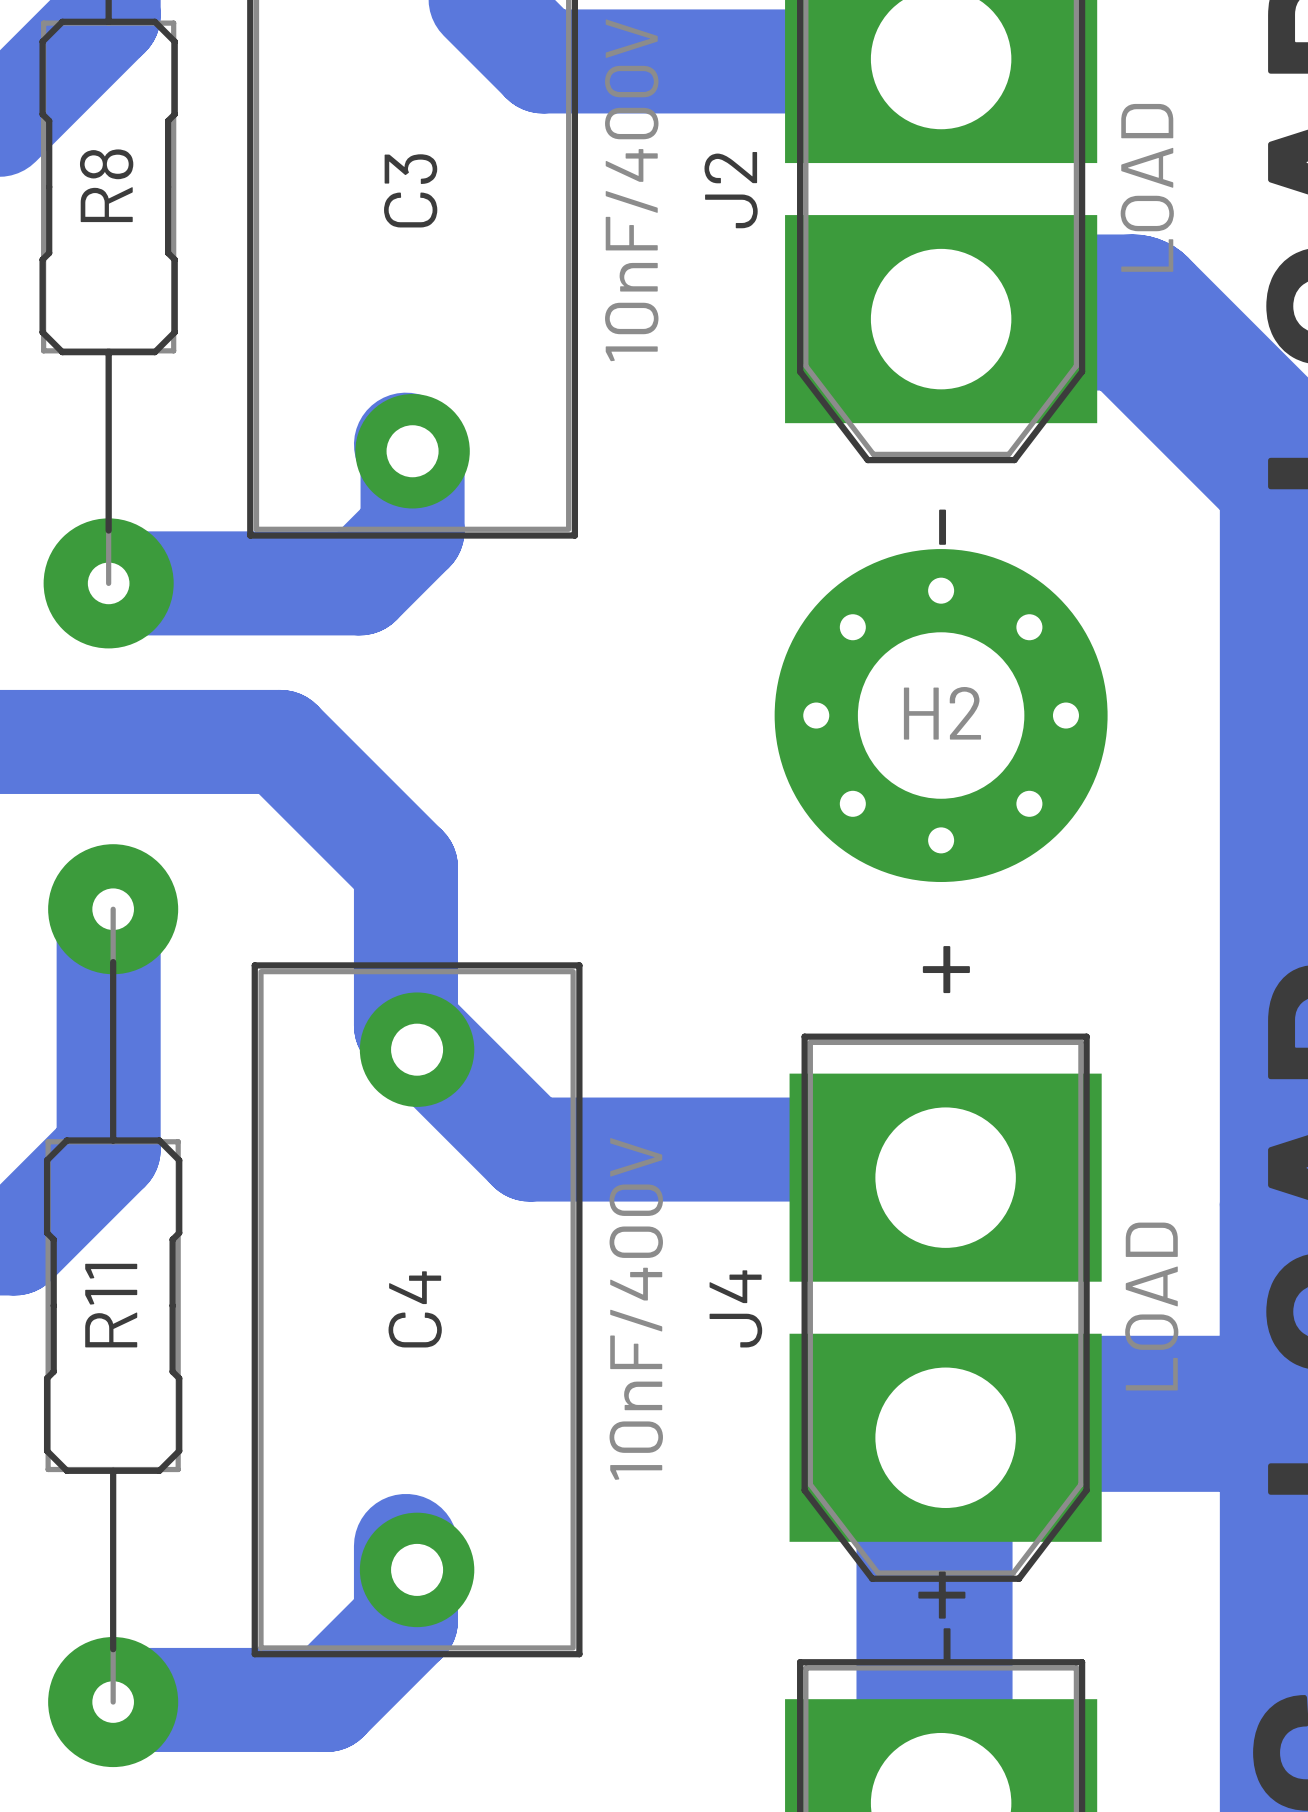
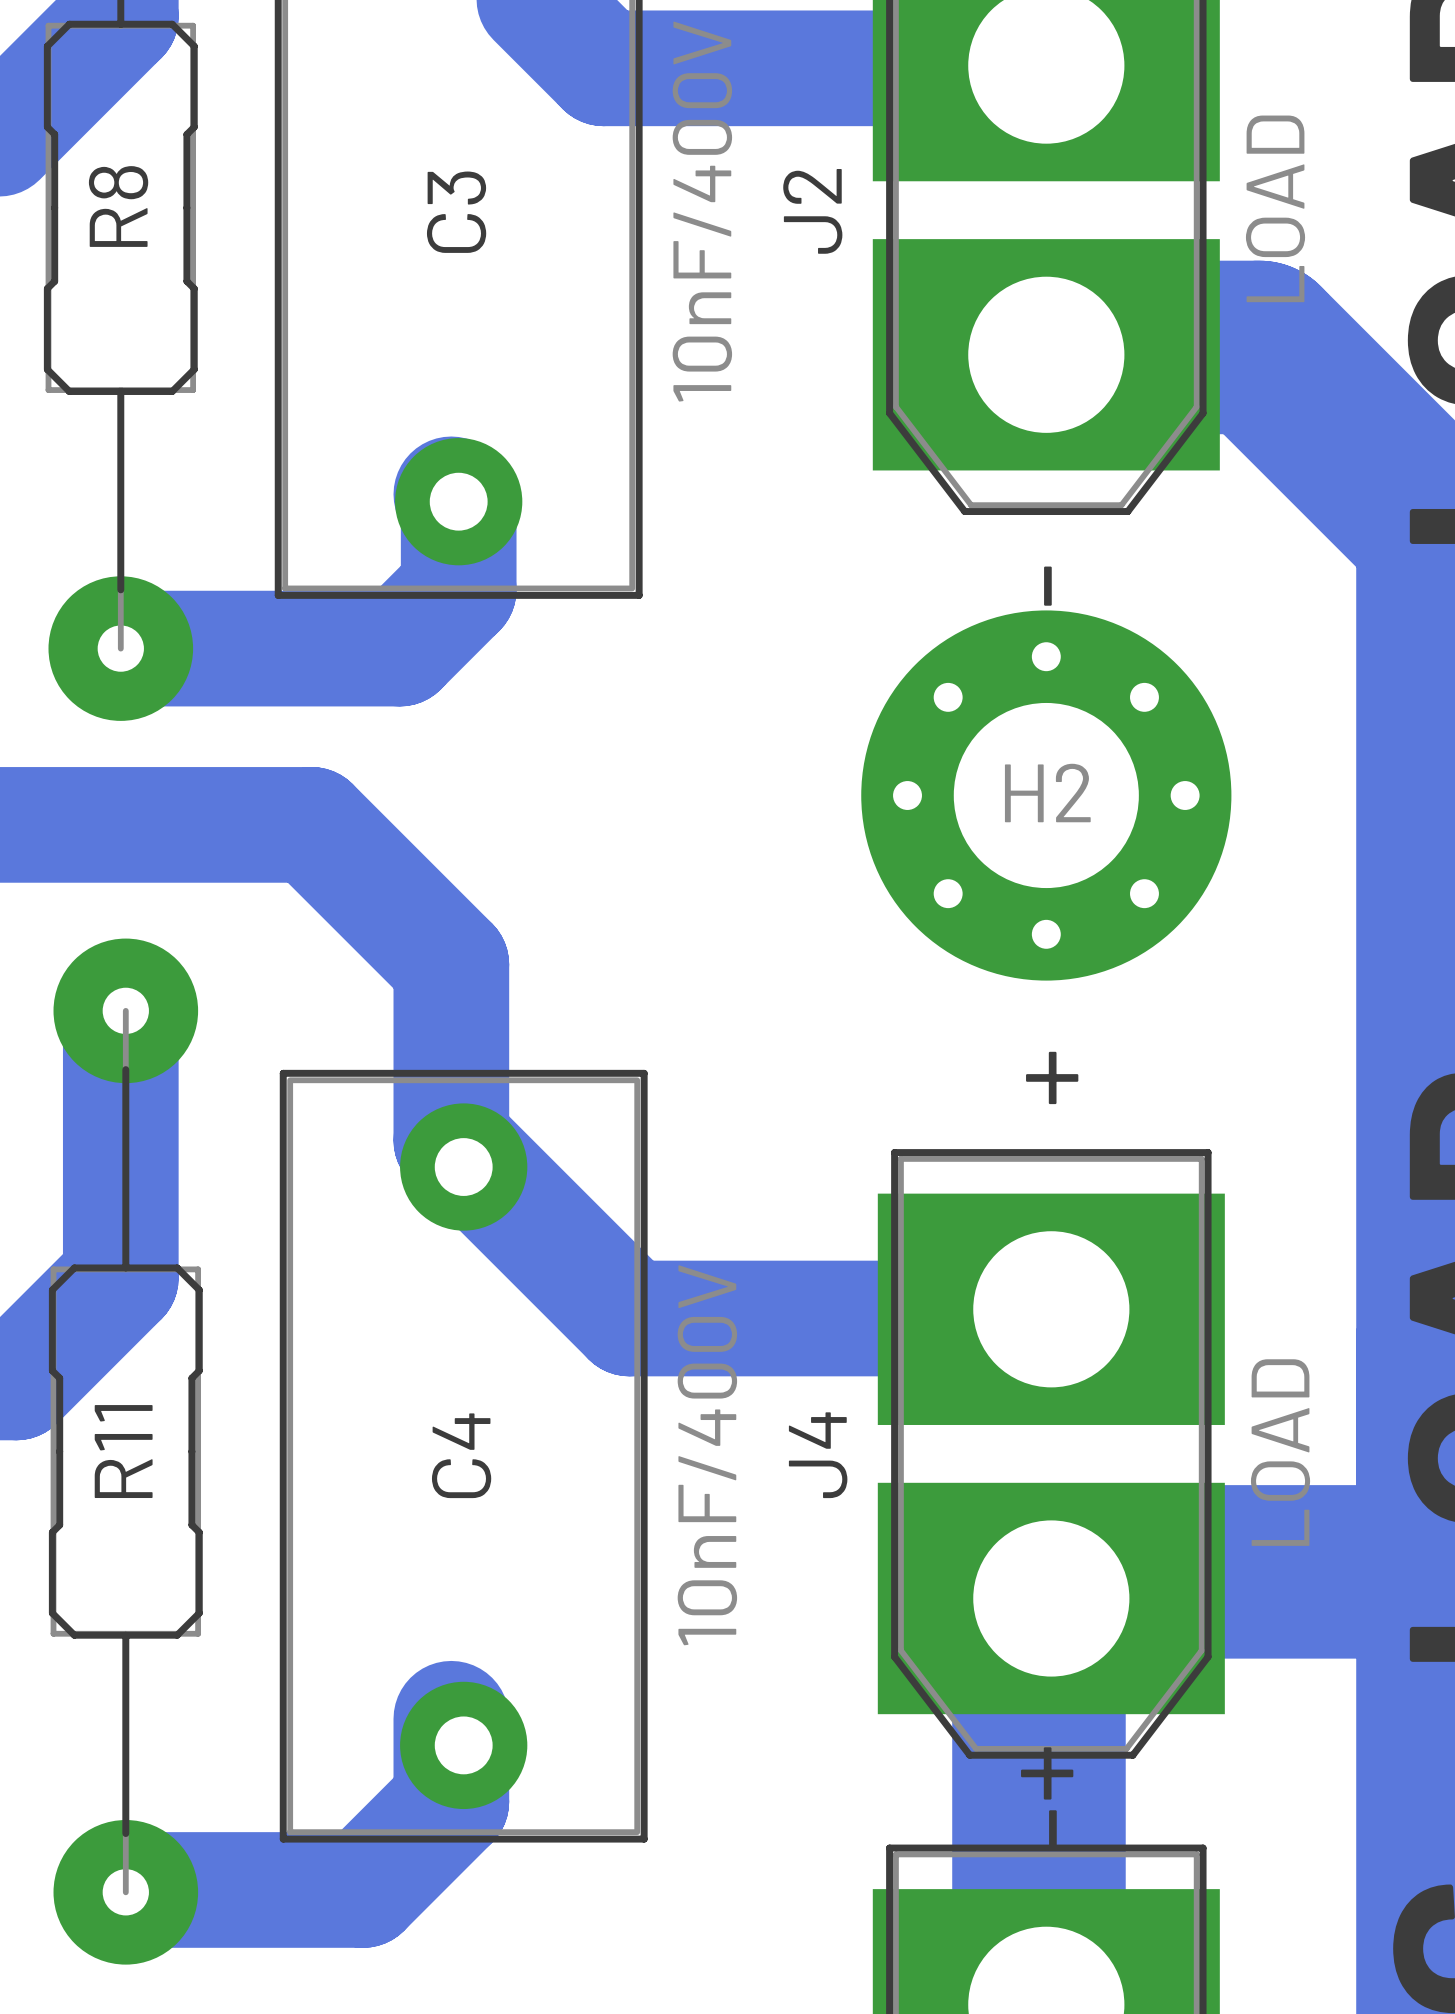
bottom track: (529, 1149) (934, 1149) -> (589, 1278) (629, 1318) (998, 1318) (1038, 1278)

